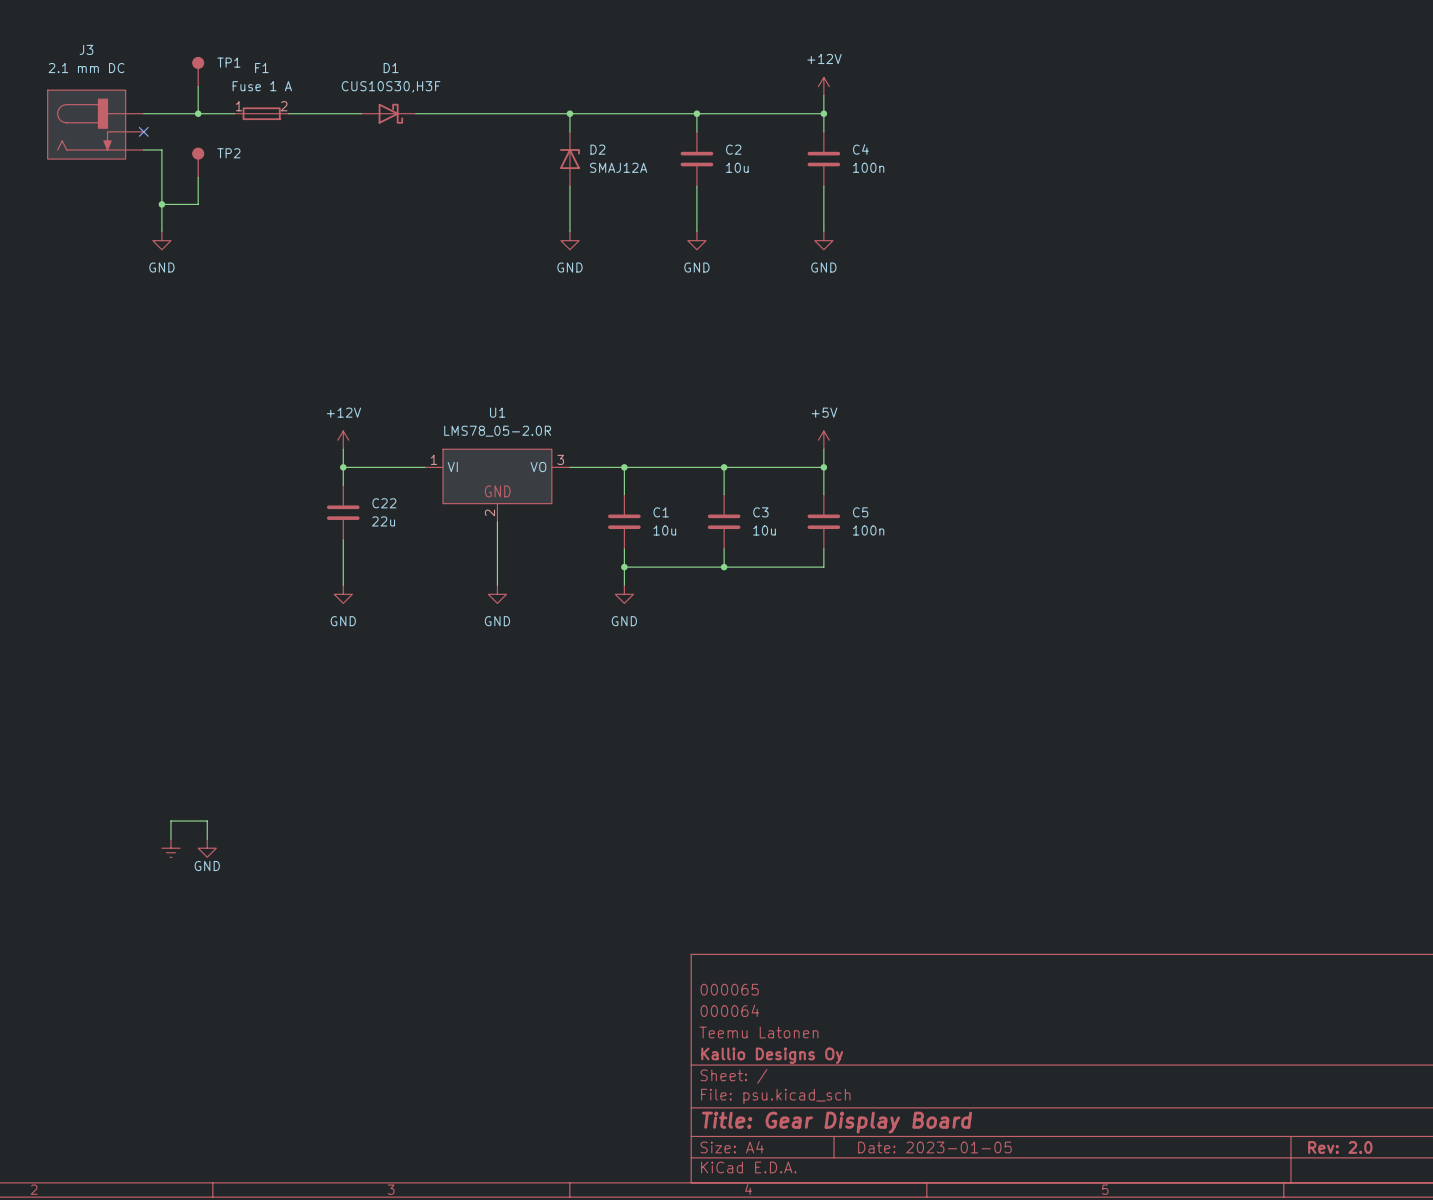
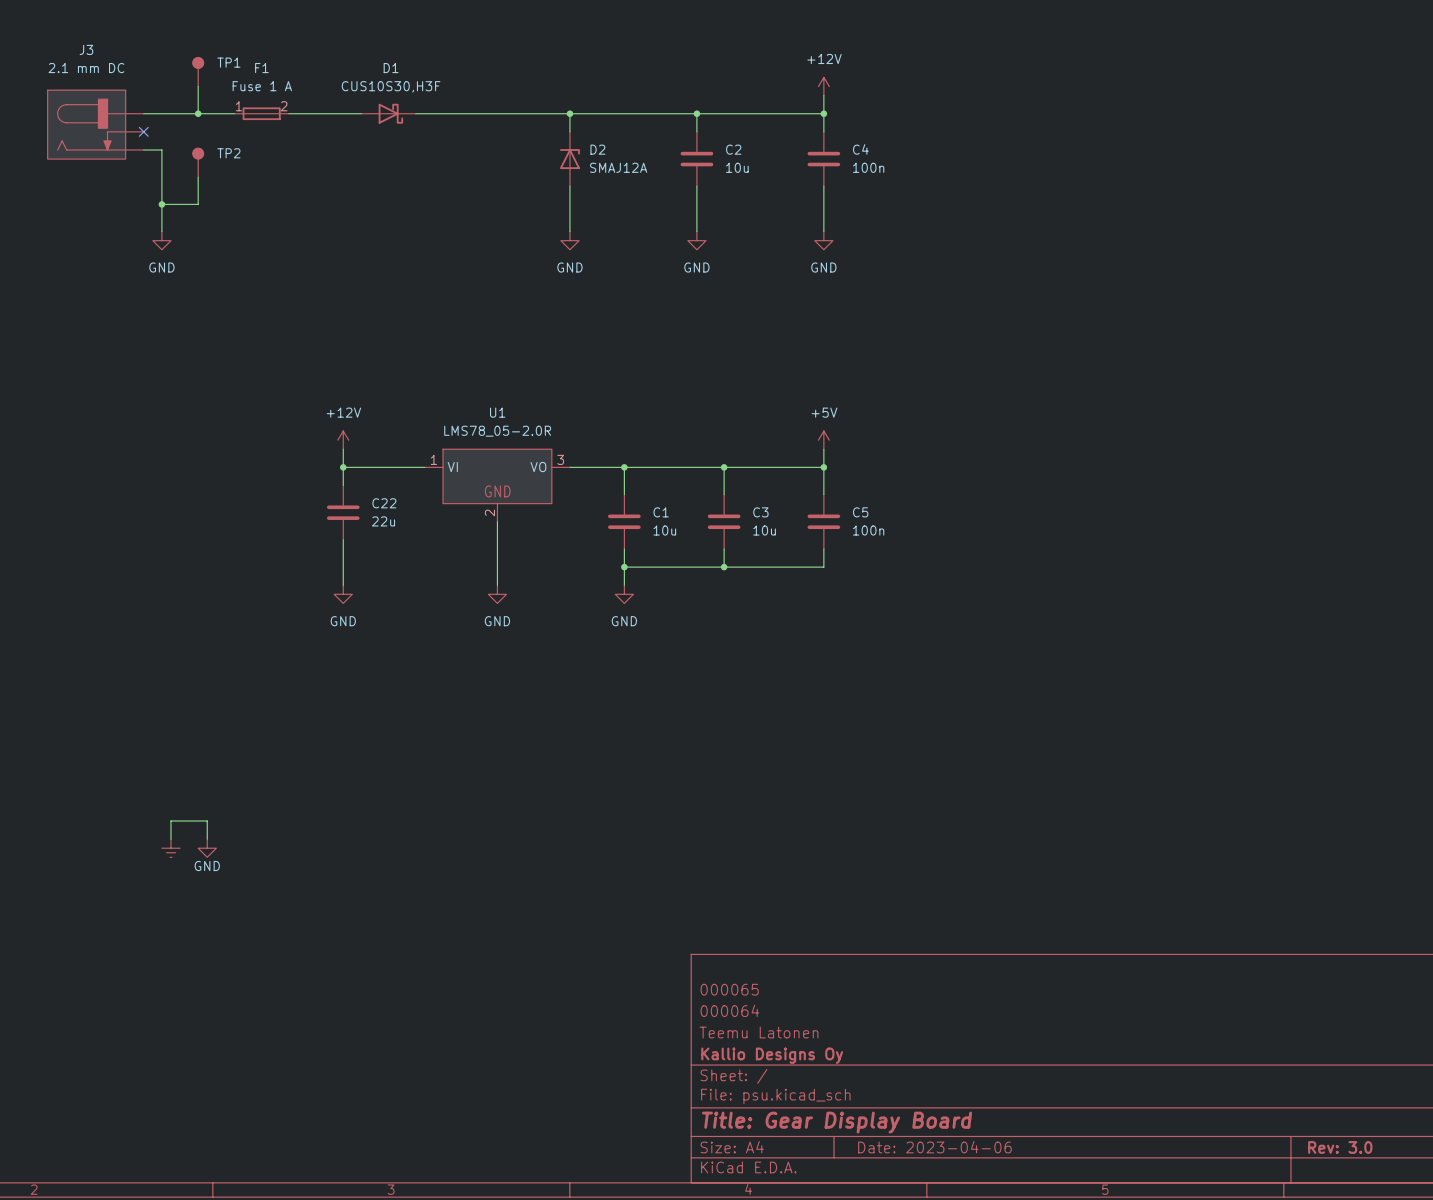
title block: Date: 2023-01-05 (934, 1147) -> Date: 2023-04-06 (934, 1147)
title block: Rev: 2.0 (1340, 1147) -> Rev: 3.0 (1340, 1147)

